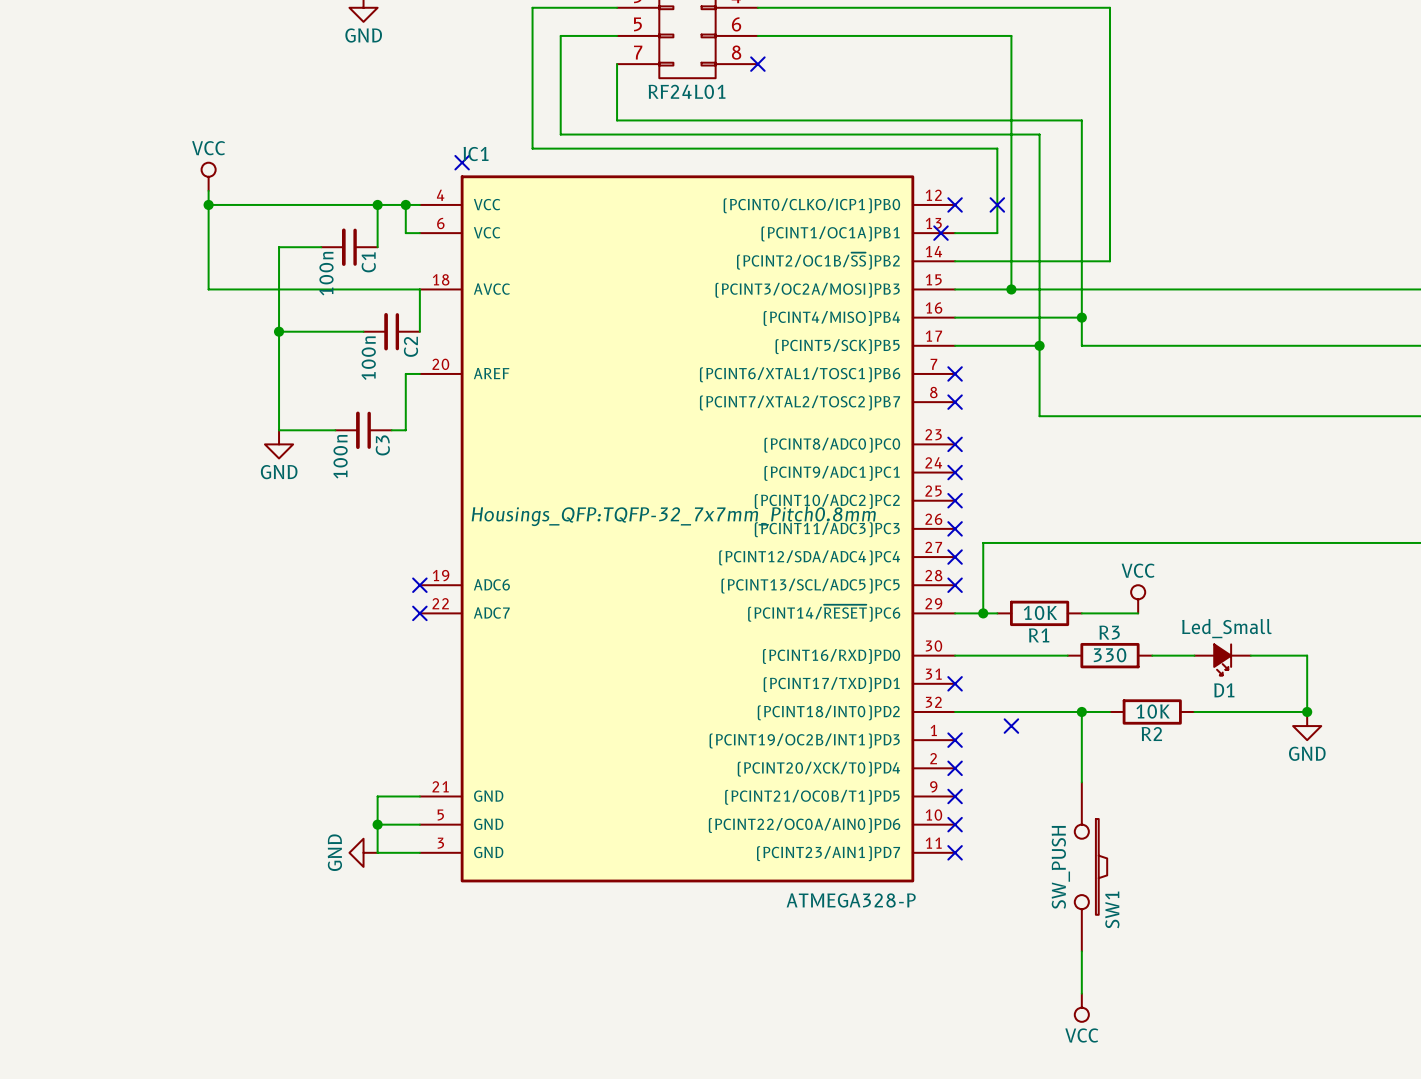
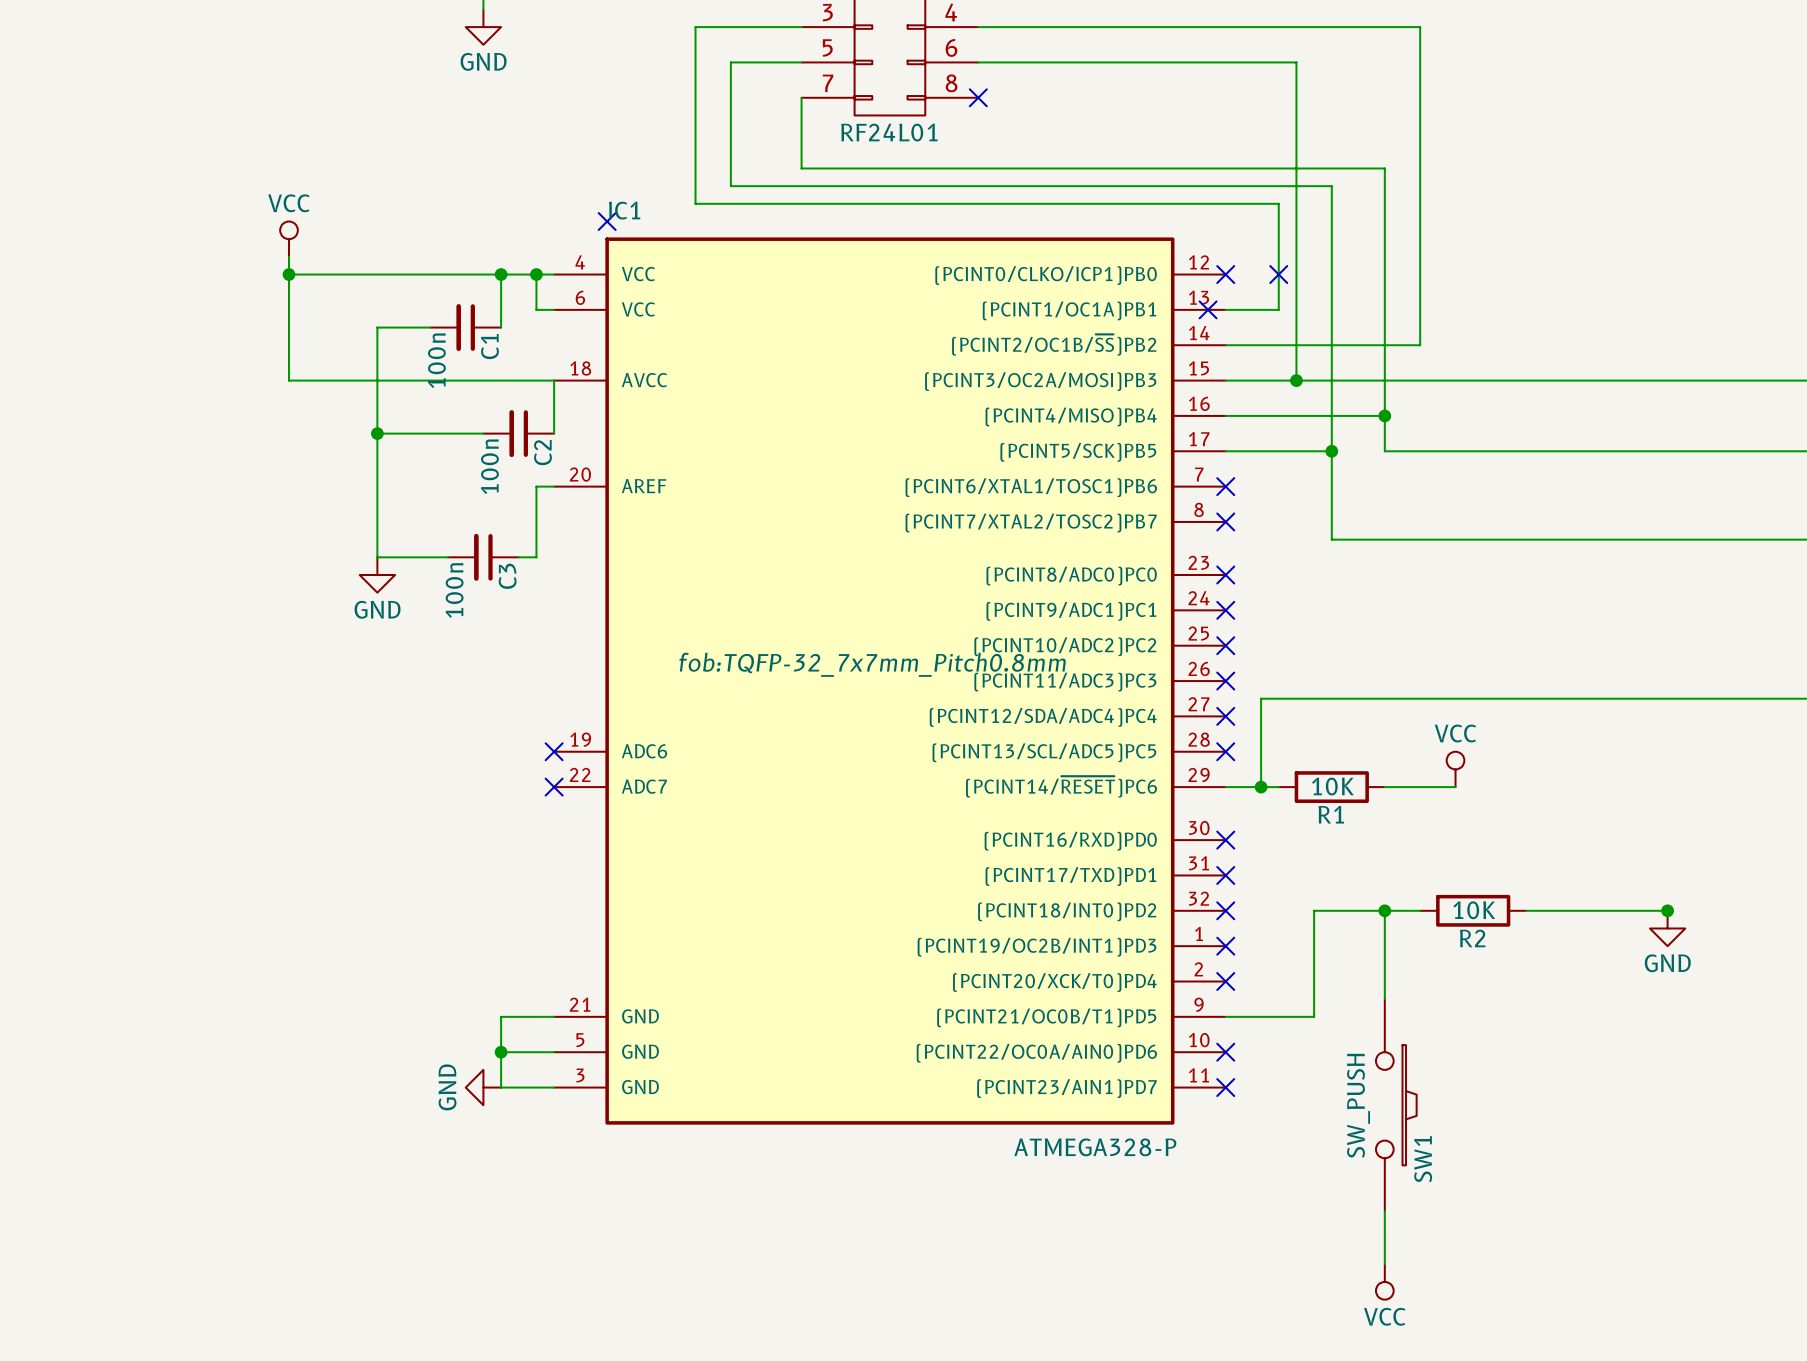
IC1 text: Housings_QFP:TQFP-32_7x7mm_Pitch0.8mm (673, 516) -> fob:TQFP-32_7x7mm_Pitch0.8mm (872, 664)
wire: (955, 655) (1067, 655) -> none
no-connect mark: none -> (1225, 840)
R3: 330 (1109, 655) -> none
wire: (1152, 655) (1194, 655) -> none
wire: (1250, 655) (1307, 655) (1307, 711) -> none
D1: Led_Small (1222, 659) -> none
wire: (955, 711) (1025, 711) -> (1225, 1016) (1314, 1016) (1314, 910)
no-connect mark: none -> (1225, 910)
no-connect mark: (1011, 726) -> none
no-connect mark: (955, 796) -> none

